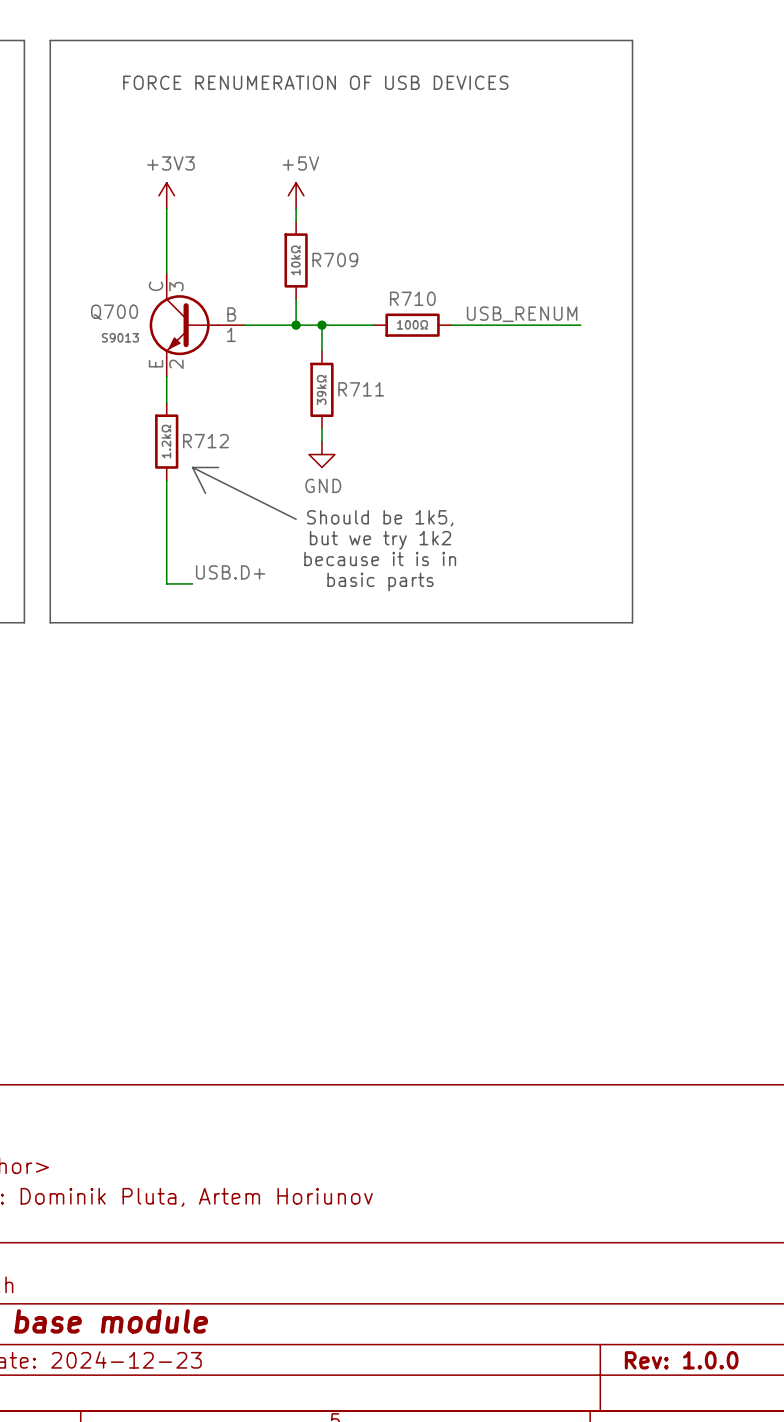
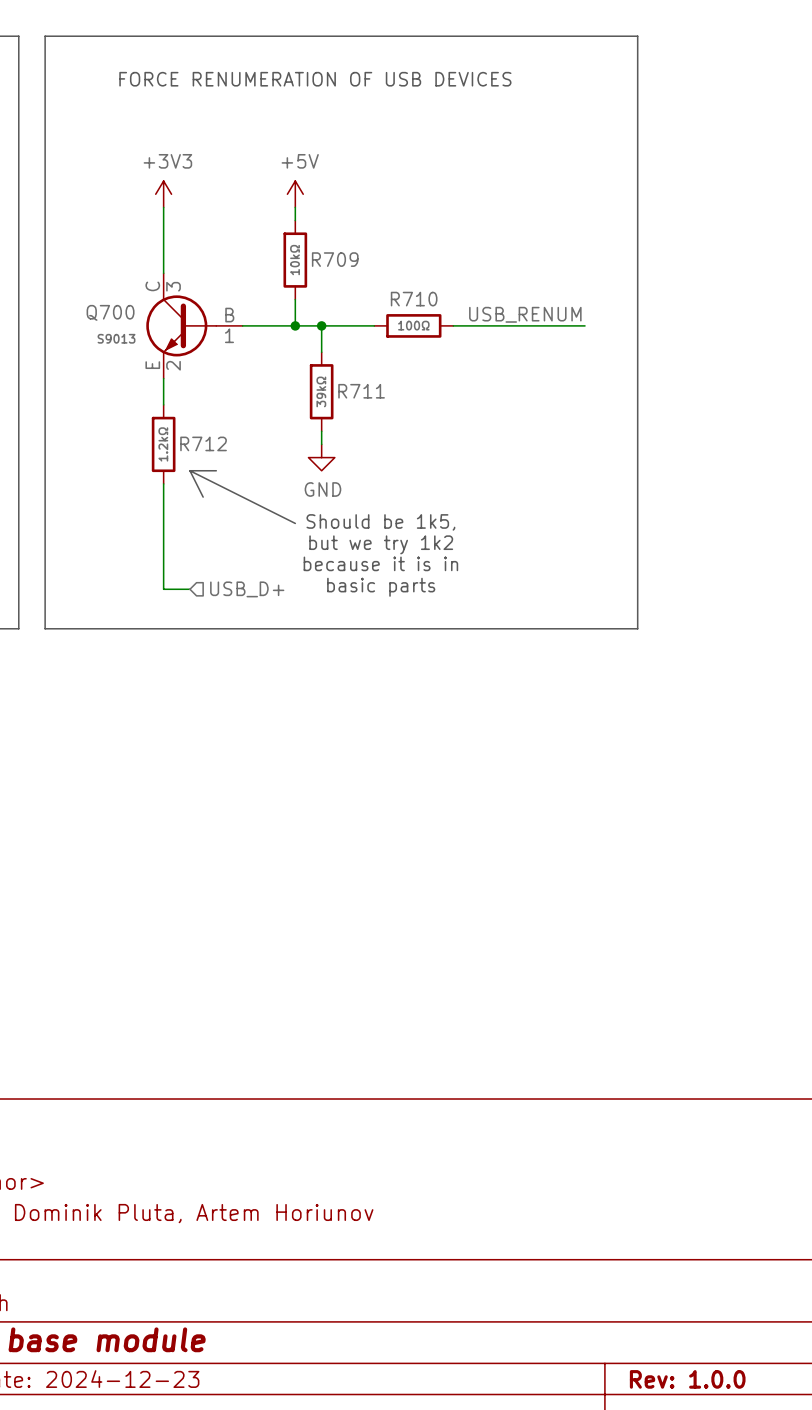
label: USB.D+ (230, 572) -> none
hierarchical label: none -> USB_D+ (247, 589)

